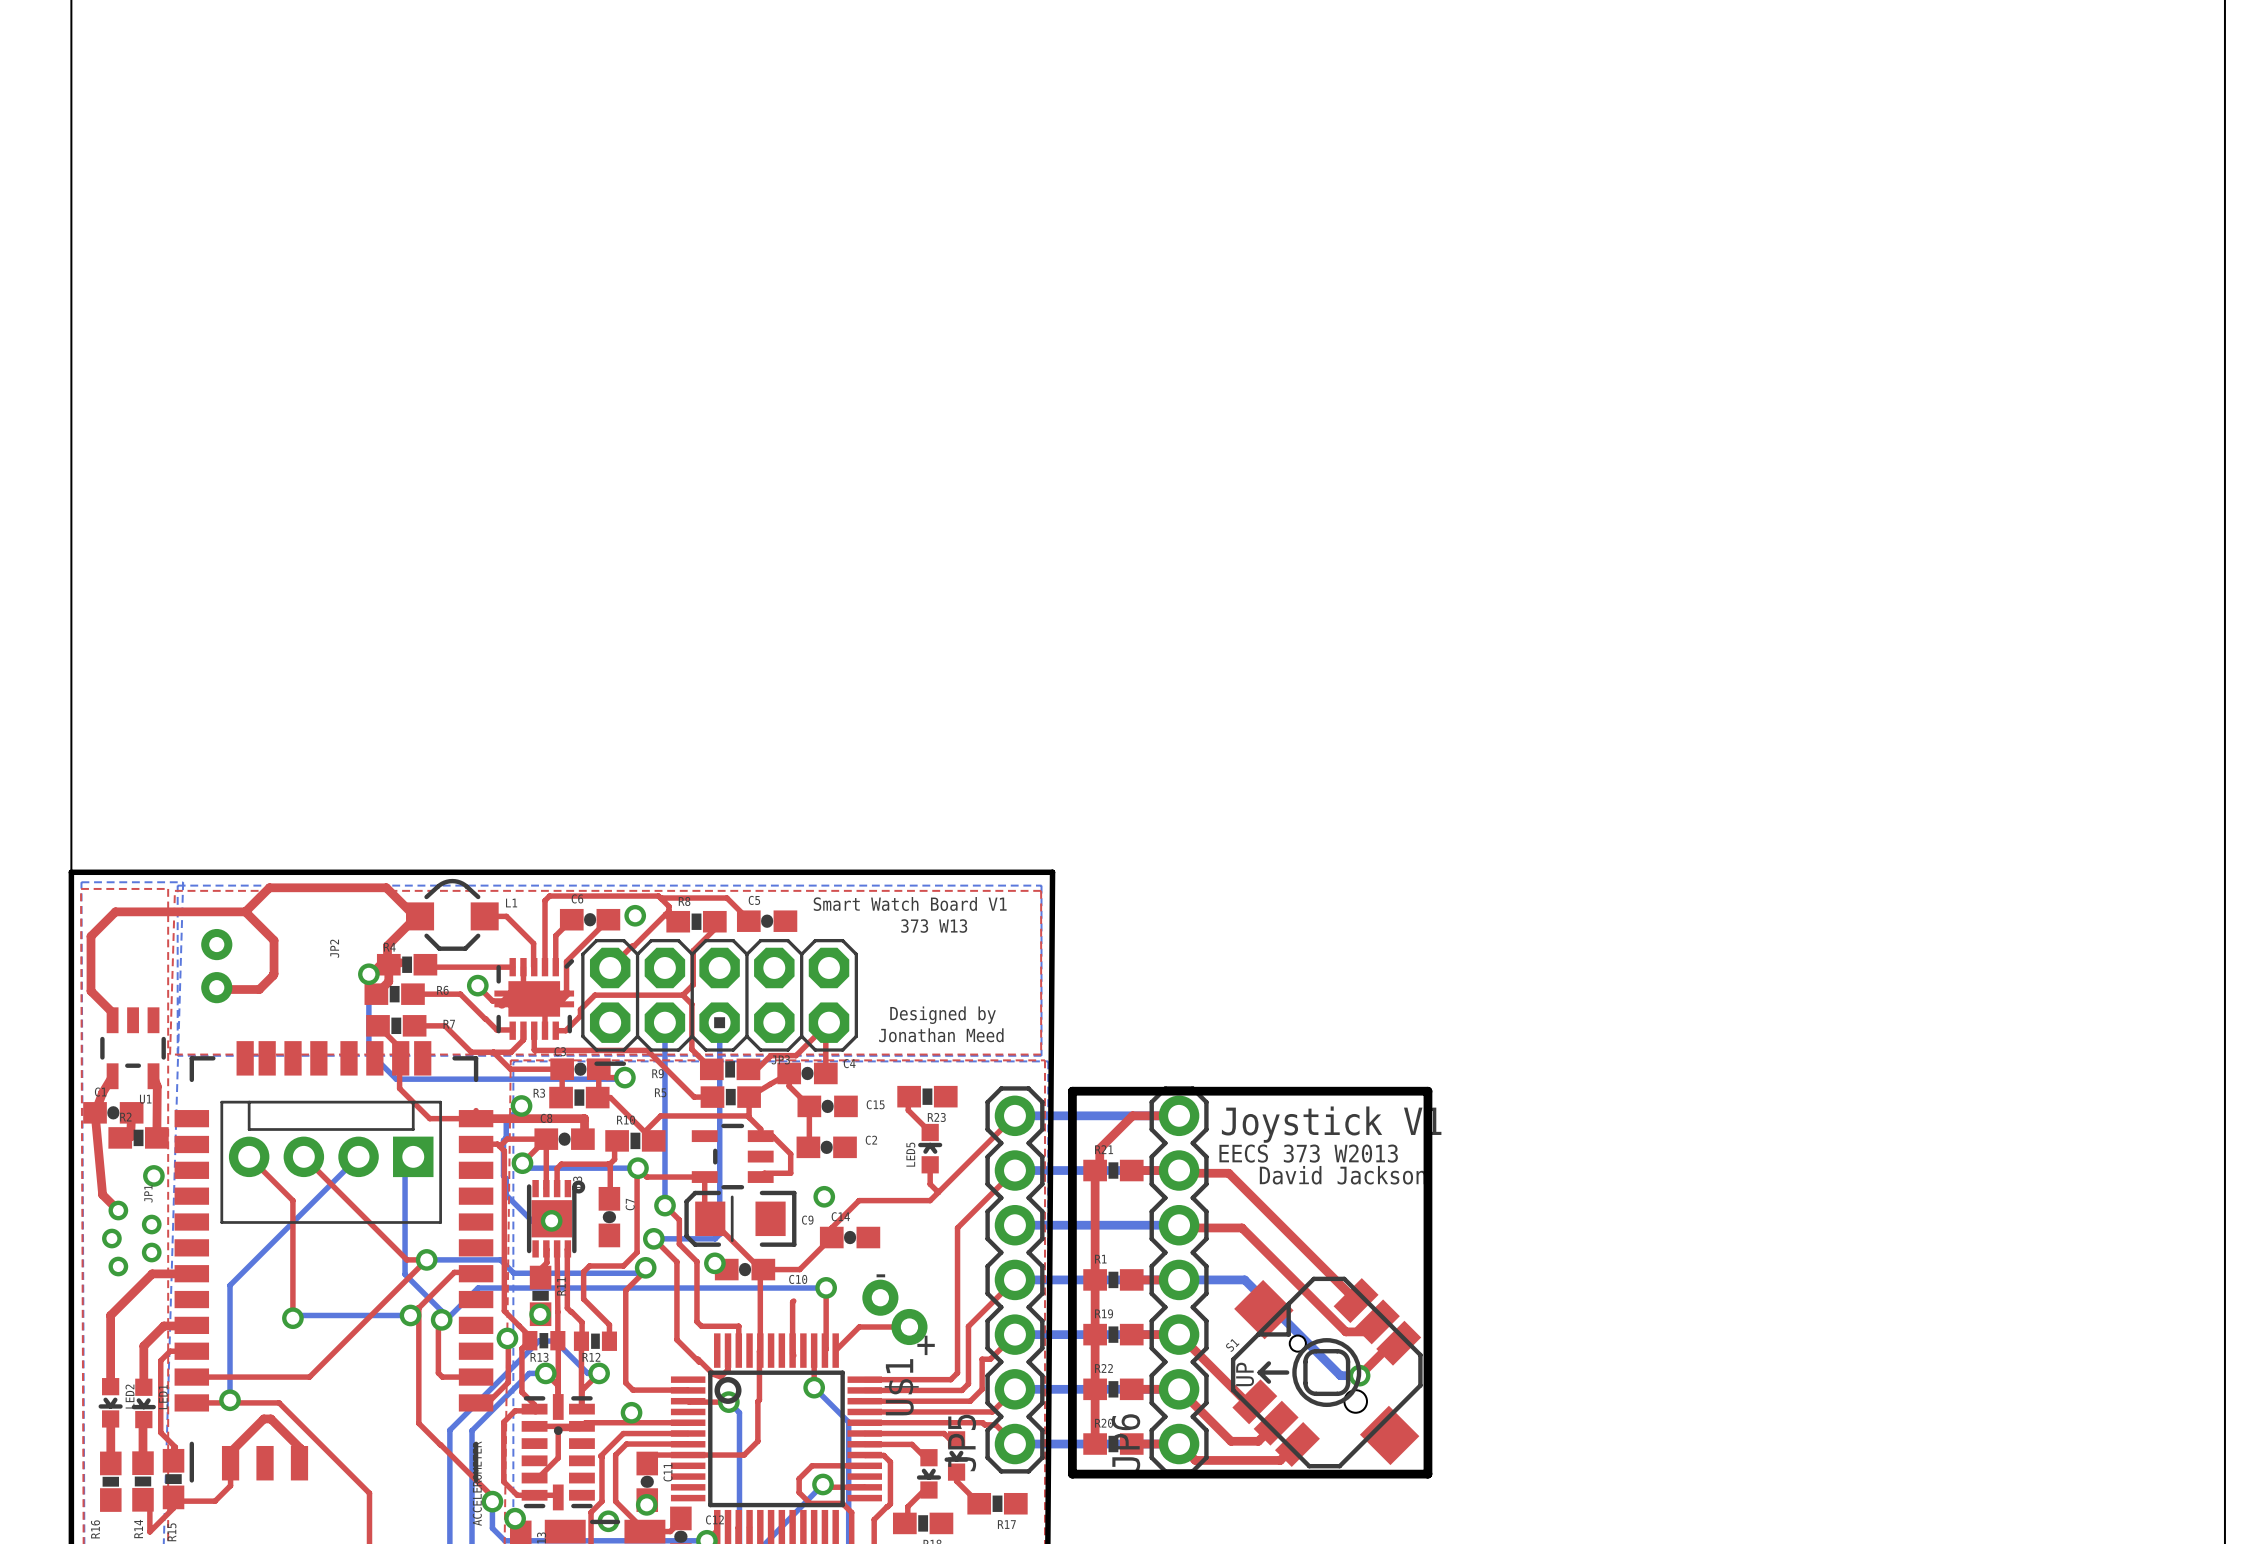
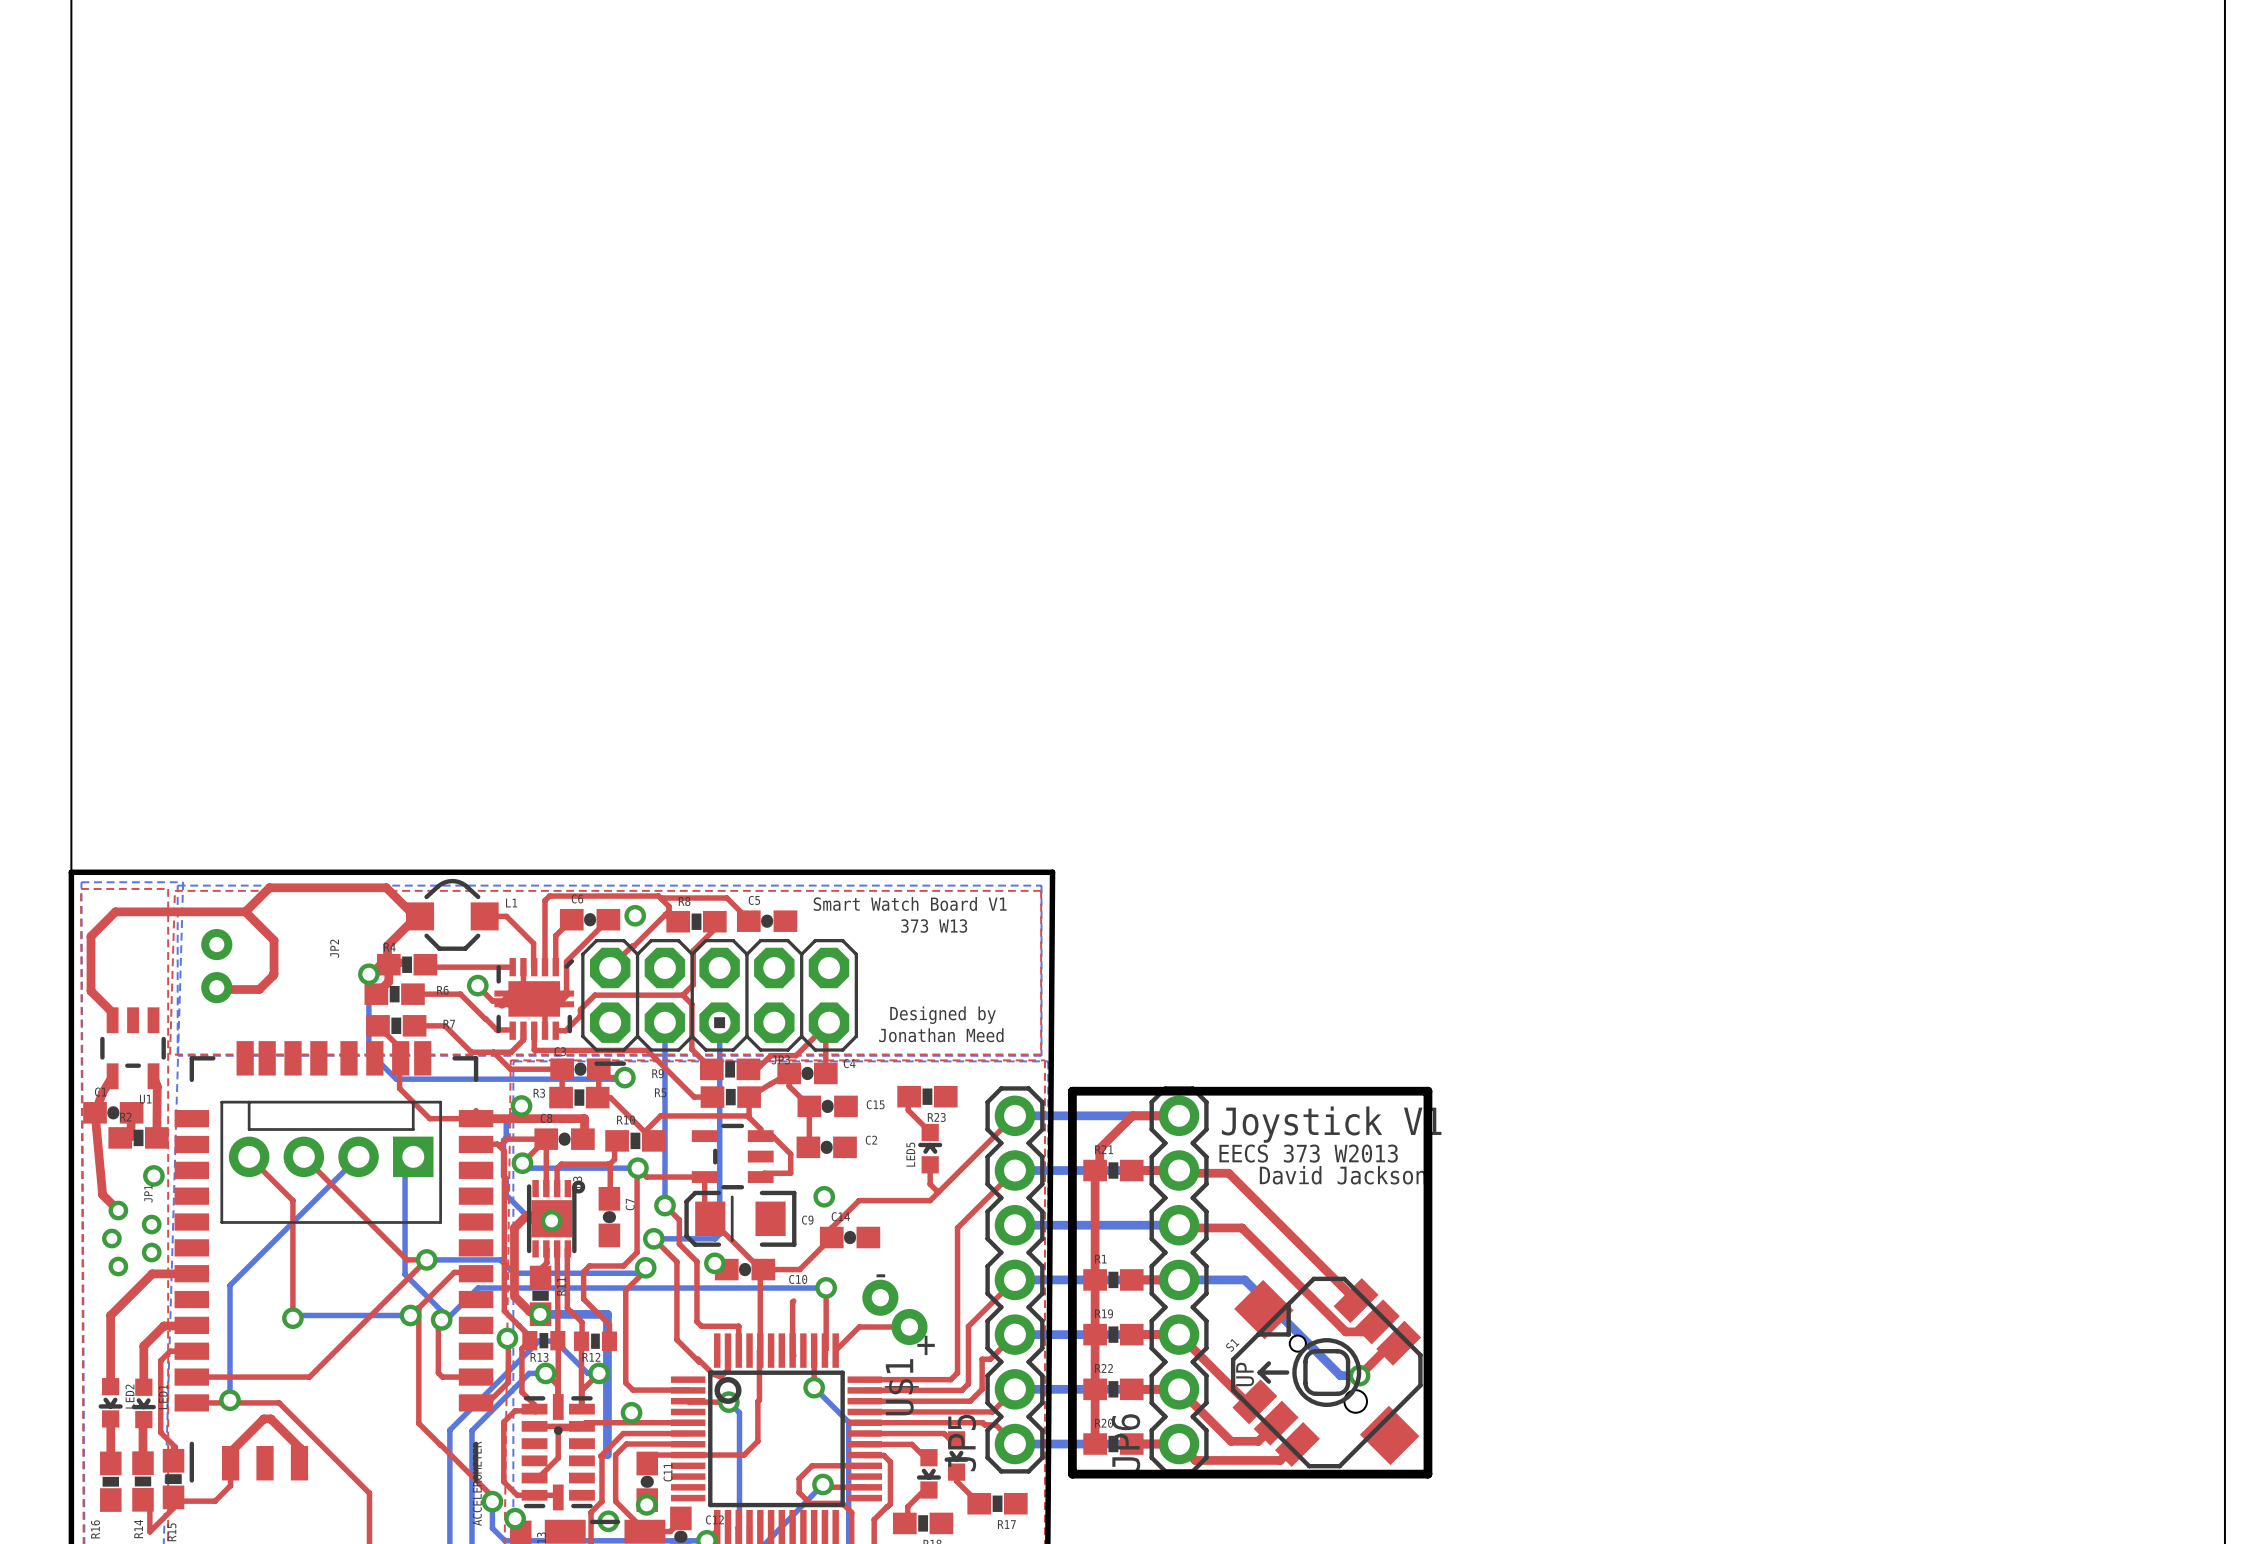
top track: none -> (551, 1218) (548, 1215) (526, 1215) (514, 1227) (514, 1296) (529, 1311) (537, 1311)
bottom track: none -> (540, 1314) (607, 1314) (607, 1454)

